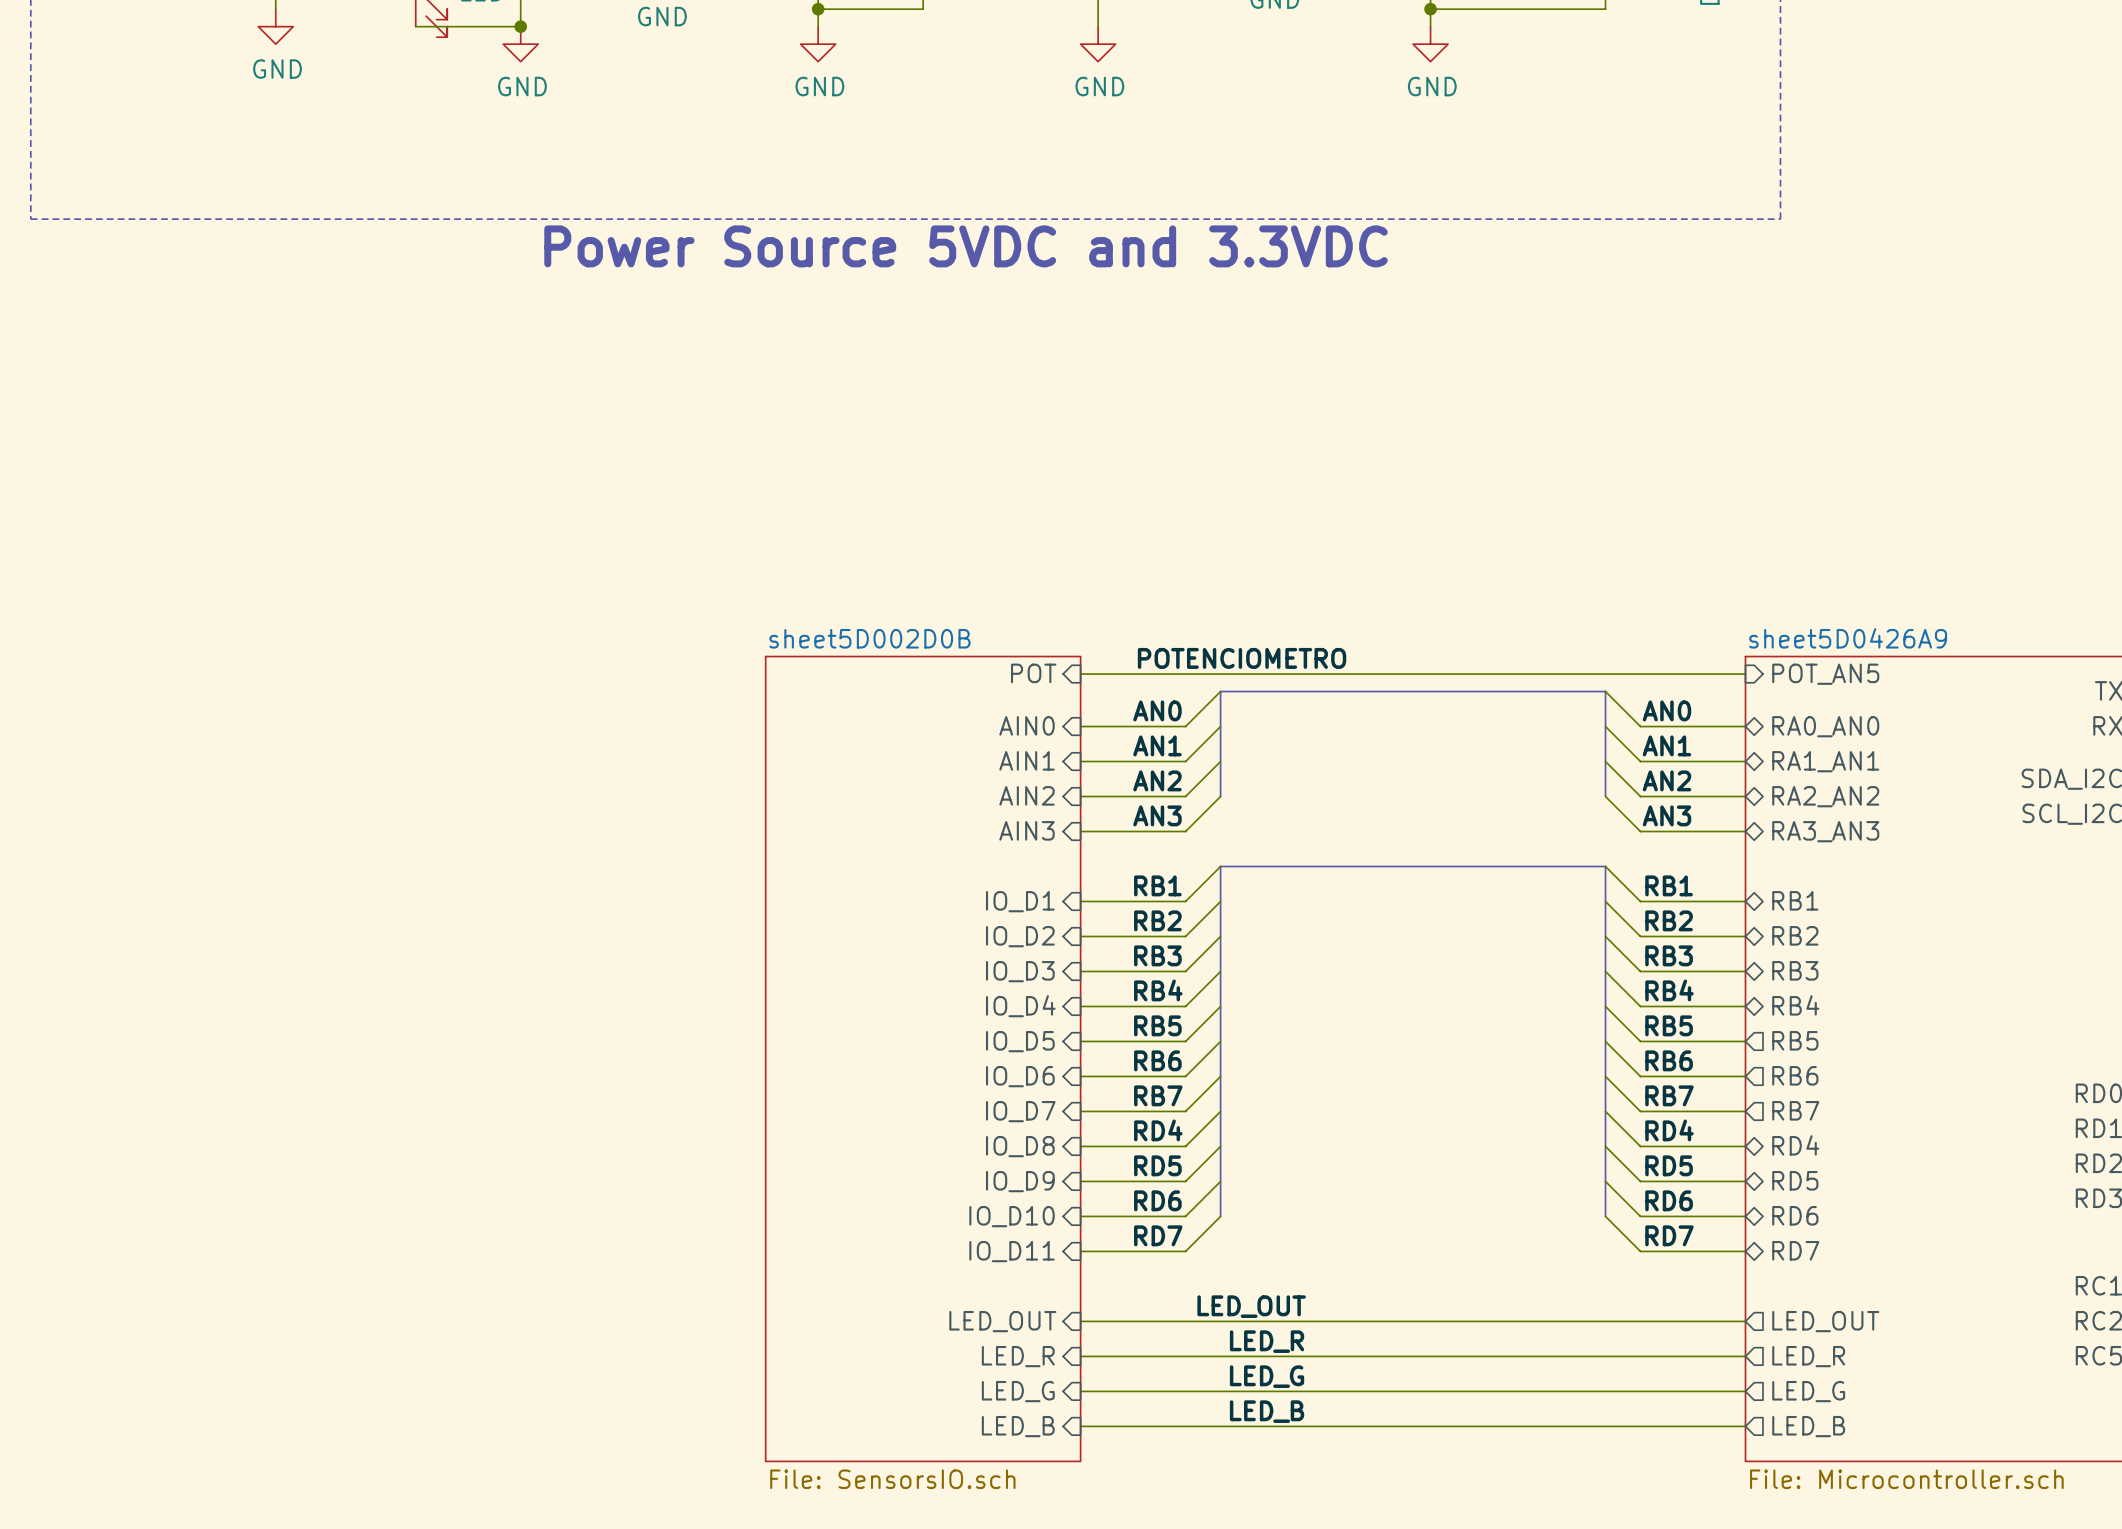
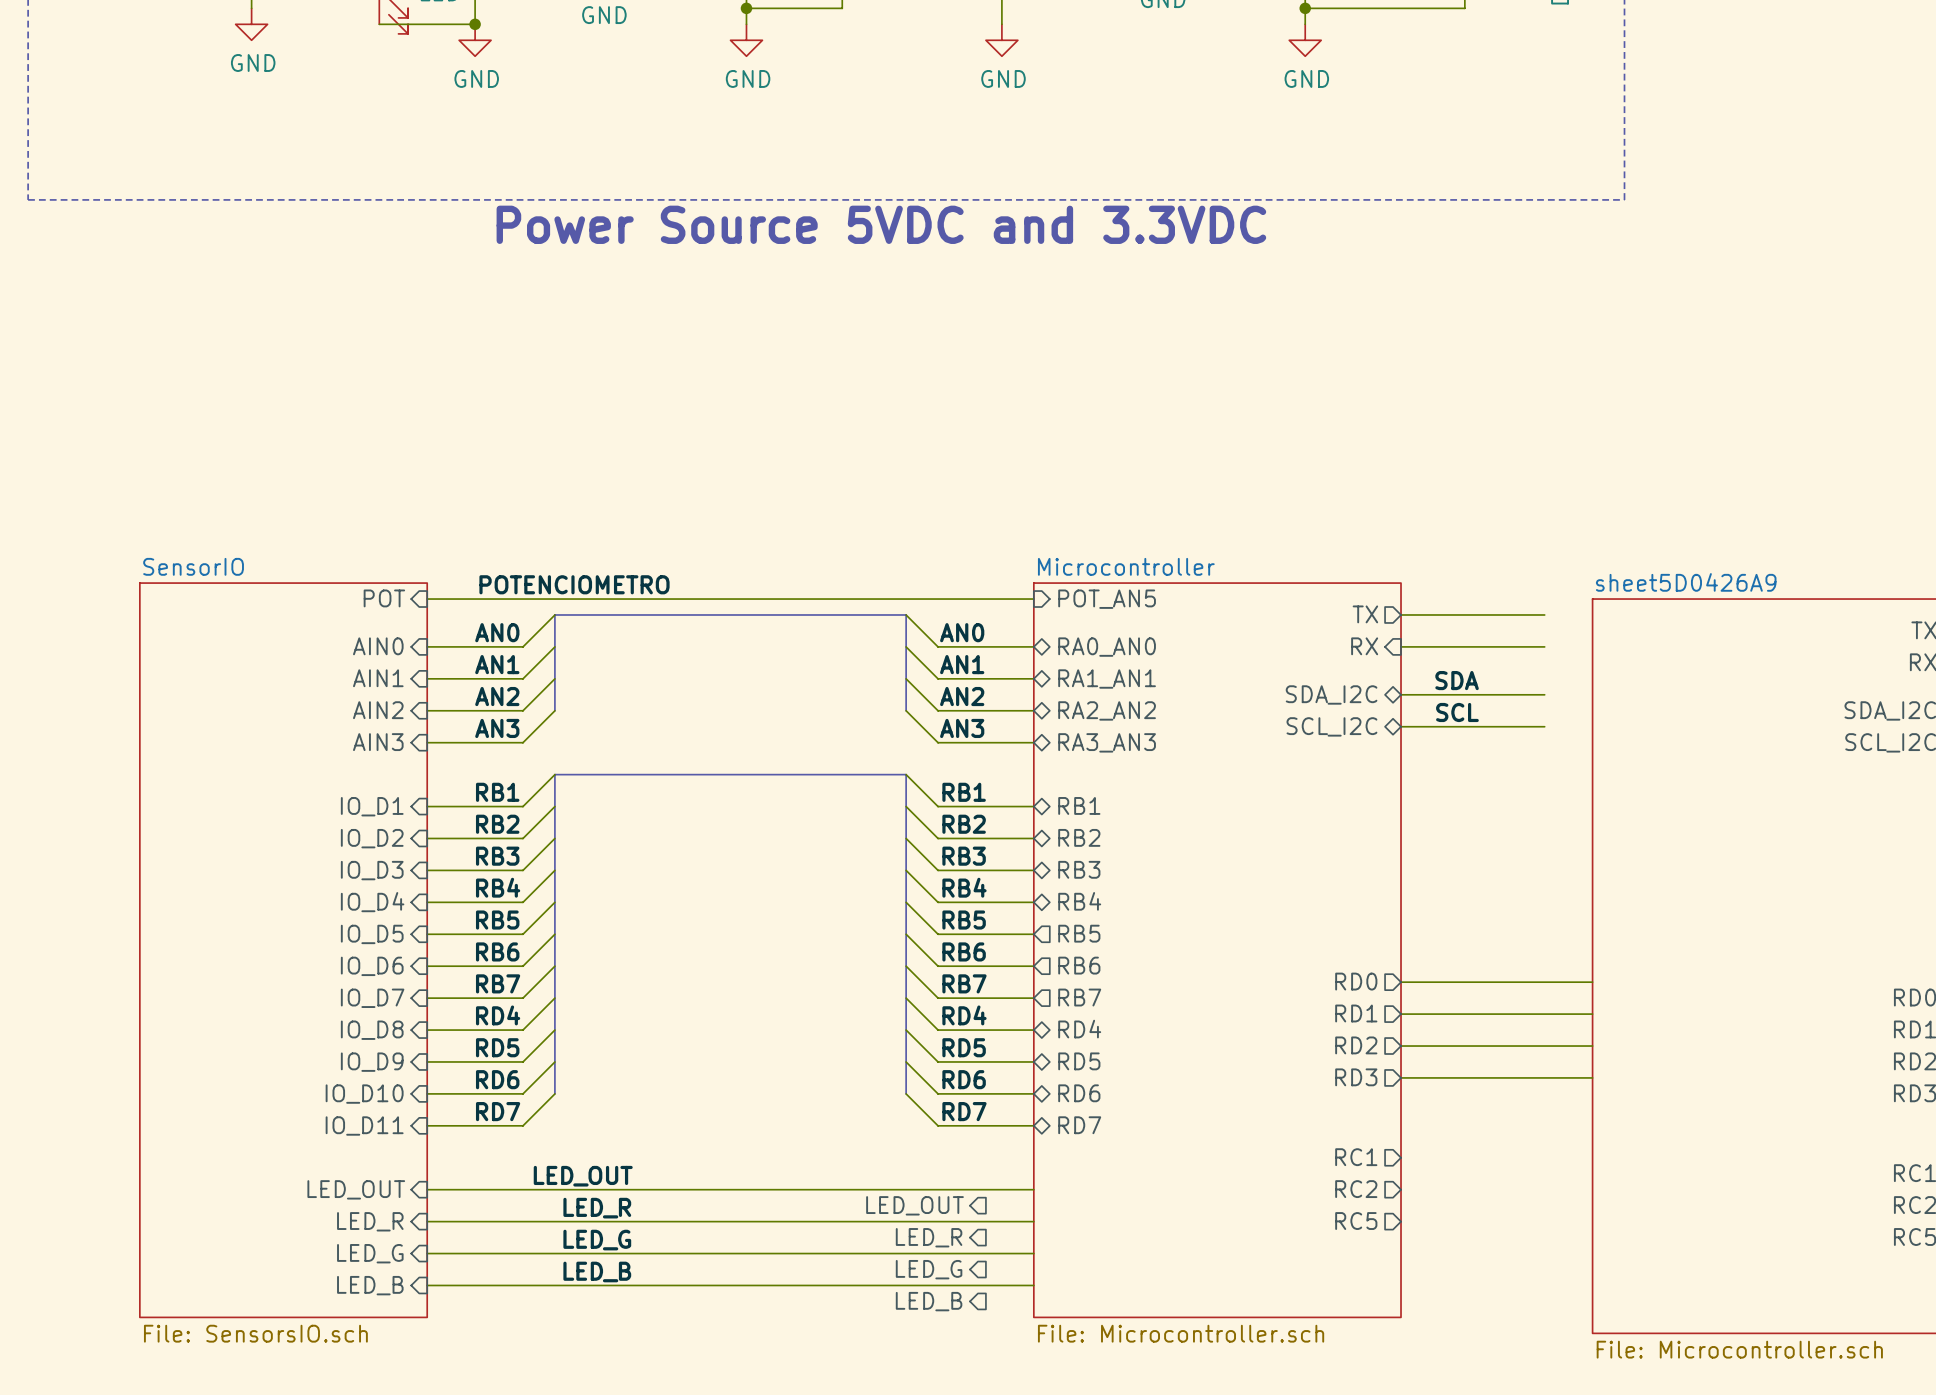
label: none -> POTENCIOMETRO (574, 584)
sheet pin: none -> POT (384, 598)
wire: none -> (427, 599) (1033, 599)
sheet pin: none -> POT_AN5 (1107, 599)
label: POTENCIOMETRO (1242, 658) -> none
sheet pin: POT (1033, 673) -> none
sheet pin: none -> TX (1365, 614)
wire: none -> (554, 614) (522, 646) (427, 646)
wire: none -> (906, 614) (938, 646) (1033, 646)
wire: (1080, 674) (1535, 674) -> none
wire: (1693, 674) (1745, 674) -> none
sheet pin: POT_AN5 (1825, 674) -> none
wire: (1220, 691) (1185, 726) (1080, 726) -> none
wire: (1605, 691) (1640, 726) (1745, 726) -> none
label: none -> AN0 (497, 632)
sheet pin: none -> AIN0 (378, 646)
sheet pin: none -> RX (1364, 646)
wire: none -> (554, 646) (522, 678) (427, 678)
wire: none -> (906, 646) (938, 678) (1033, 678)
sheet pin: none -> RA0_AN0 (1107, 647)
wire: none -> (1401, 646) (1544, 646)
label position: AN0 (1157, 710) -> AN0 (962, 632)
label: AN0 (1666, 710) -> none
sheet pin: AIN0 (1027, 725) -> none
wire: (1220, 726) (1185, 761) (1080, 761) -> none
wire: (1605, 726) (1640, 761) -> (1401, 694) (1496, 694)
sheet pin: RA0_AN0 (1825, 726) -> none
label: none -> AN1 (497, 664)
sheet pin: none -> AIN1 (378, 678)
wire: none -> (554, 678) (522, 710) (427, 710)
wire: none -> (906, 678) (938, 710) (1033, 710)
sheet pin: none -> RA1_AN1 (1107, 679)
label position: AN1 (1157, 745) -> AN1 (962, 664)
label: none -> SDA (1457, 680)
label: AN1 (1666, 745) -> none
sheet pin: AIN1 (1027, 760) -> none
wire: (1220, 761) (1185, 796) (1080, 796) -> none
sheet pin: none -> SDA_I2C (1331, 694)
wire: (1605, 761) (1640, 796) -> (1401, 726) (1496, 726)
wire: (1693, 761) (1745, 761) -> none
sheet pin: RA1_AN1 (1825, 761) -> none
label: none -> AN2 (497, 696)
sheet pin: none -> AIN2 (378, 710)
wire: none -> (554, 710) (522, 742) (427, 742)
bus: none -> (554, 710) (554, 614) (906, 614) (906, 710)
wire: none -> (906, 710) (938, 742) (1033, 742)
sheet pin: none -> RA2_AN2 (1107, 710)
label position: AN2 (1157, 780) -> AN2 (962, 696)
label: none -> SCL (1457, 712)
label: AN2 (1666, 780) -> none
sheet pin: AIN2 (1027, 795) -> none
wire: (1220, 796) (1185, 831) (1080, 831) -> none
bus: (1220, 796) (1220, 691) (1605, 691) (1605, 796) -> none
sheet pin: none -> SCL_I2C (1331, 726)
wire: (1605, 796) (1640, 831) (1745, 831) -> none
wire: (1693, 796) (1745, 796) -> none
sheet pin: RA2_AN2 (1825, 796) -> none
label: none -> AN3 (497, 728)
sheet pin: none -> AIN3 (378, 742)
sheet pin: none -> RA3_AN3 (1107, 742)
label position: AN3 (1157, 815) -> AN3 (962, 728)
label: AN3 (1666, 815) -> none
sheet pin: AIN3 (1027, 830) -> none
sheet pin: RA3_AN3 (1825, 831) -> none
wire: none -> (554, 774) (522, 806) (427, 806)
wire: none -> (906, 774) (938, 806) (1033, 806)
wire: (1220, 866) (1185, 901) (1080, 901) -> none
wire: (1605, 866) (1640, 901) (1745, 901) -> none
label: none -> RB1 (497, 792)
sheet pin: none -> RB1 (1079, 805)
sheet pin: none -> IO_D1 (372, 806)
wire: none -> (554, 806) (522, 838) (427, 838)
wire: none -> (906, 806) (938, 838) (1033, 838)
label position: RB1 (1157, 885) -> RB1 (964, 792)
label: RB1 (1669, 885) -> none
sheet pin: RB1 (1795, 900) -> none
sheet pin: IO_D1 (1020, 901) -> none
wire: (1220, 901) (1185, 936) (1080, 936) -> none
wire: (1605, 901) (1640, 936) (1745, 936) -> none
label: none -> RB2 (497, 824)
wire: none -> (554, 838) (522, 870) (427, 870)
wire: none -> (906, 838) (938, 870) (1033, 870)
sheet pin: none -> RB2 (1079, 837)
sheet pin: none -> IO_D2 (372, 838)
label position: RB2 (1157, 920) -> RB2 (964, 824)
label: RB2 (1669, 920) -> none
sheet pin: RB2 (1795, 935) -> none
sheet pin: IO_D2 (1020, 936) -> none
wire: (1220, 936) (1185, 971) (1080, 971) -> none
wire: (1605, 936) (1640, 971) (1745, 971) -> none
label: none -> RB3 (497, 856)
wire: none -> (554, 870) (522, 902) (427, 902)
wire: none -> (906, 870) (938, 902) (1033, 902)
sheet pin: none -> RB3 (1079, 869)
sheet pin: none -> IO_D3 (372, 870)
label position: RB3 (1157, 955) -> RB3 (964, 856)
label: RB3 (1669, 955) -> none
sheet pin: RB3 (1795, 970) -> none
sheet pin: IO_D3 (1020, 971) -> none
wire: (1220, 971) (1185, 1006) (1080, 1006) -> none
wire: (1605, 971) (1640, 1006) (1745, 1006) -> none
label: none -> RB4 (498, 887)
sheet pin: none -> RB4 (1079, 901)
sheet pin: none -> IO_D4 (372, 902)
wire: none -> (554, 902) (522, 934) (427, 934)
wire: none -> (906, 902) (938, 934) (1033, 934)
label position: RB4 (1158, 990) -> RB4 (964, 887)
label: RB4 (1669, 990) -> none
sheet pin: RB4 (1795, 1005) -> none
sheet pin: IO_D4 (1020, 1006) -> none
wire: (1220, 1006) (1185, 1041) (1080, 1041) -> none
wire: (1605, 1006) (1640, 1041) (1745, 1041) -> none
label: none -> RB5 (497, 920)
wire: none -> (554, 934) (522, 966) (427, 966)
wire: none -> (906, 934) (938, 966) (1033, 966)
sheet pin: none -> RB5 (1079, 933)
sheet pin: none -> IO_D5 (372, 934)
label position: RB5 (1157, 1025) -> RB5 (964, 920)
label: RB5 (1669, 1025) -> none
sheet pin: RB5 (1795, 1040) -> none
sheet SensorIO: none -> File: SensorsIO.sch (283, 950)
sheet pin: IO_D5 (1020, 1041) -> none
wire: (1220, 1041) (1185, 1076) (1080, 1076) -> none
sheet Microcontroller: none -> File: Microcontroller.sch (1217, 950)
wire: (1605, 1041) (1640, 1076) -> (1401, 982) (1496, 982)
label: none -> RB6 (497, 951)
wire: none -> (554, 966) (522, 998) (427, 998)
sheet sheet5D002D0B: File: SensorsIO.sch (923, 1058) -> none
wire: none -> (906, 966) (938, 998) (1033, 998)
sheet pin: none -> RB6 (1079, 965)
sheet pin: none -> IO_D6 (372, 966)
label position: RB6 (1157, 1060) -> RB6 (964, 951)
label: RB6 (1669, 1060) -> none
sheet pin: none -> RD0 (1356, 981)
sheet pin: RB6 (1795, 1075) -> none
sheet pin: IO_D6 (1020, 1076) -> none
wire: (1220, 1076) (1185, 1111) (1080, 1111) -> none
wire: (1605, 1076) (1640, 1111) -> (1401, 1014) (1496, 1014)
label: none -> RB7 (498, 983)
wire: none -> (554, 998) (522, 1030) (427, 1030)
wire: none -> (906, 998) (938, 1030) (1033, 1030)
sheet pin: none -> RB7 (1079, 997)
sheet pin: none -> IO_D7 (372, 998)
label position: RB7 (1158, 1095) -> RB7 (964, 983)
label: RB7 (1669, 1095) -> none
sheet pin: none -> RD1 (1356, 1013)
sheet pin: RB7 (1795, 1110) -> none
sheet pin: IO_D7 (1020, 1111) -> none
wire: (1220, 1111) (1185, 1146) (1080, 1146) -> none
wire: (1605, 1111) (1640, 1146) -> (1401, 1046) (1496, 1046)
label: none -> RD4 (498, 1015)
sheet pin: none -> RD4 (1079, 1029)
wire: none -> (554, 1030) (522, 1061) (427, 1061)
wire: none -> (906, 1030) (938, 1061) (1033, 1061)
sheet pin: none -> IO_D8 (372, 1030)
label position: RD4 (1158, 1130) -> RD4 (964, 1015)
label: RD4 (1669, 1130) -> none
sheet pin: none -> RD2 (1356, 1045)
sheet pin: RD4 (1795, 1145) -> none
sheet pin: IO_D8 (1020, 1146) -> none
wire: (1220, 1146) (1185, 1181) (1080, 1181) -> none
wire: (1605, 1146) (1640, 1181) -> (1401, 1077) (1496, 1077)
label: none -> RD5 (497, 1047)
wire: none -> (554, 1061) (522, 1093) (427, 1093)
wire: none -> (906, 1061) (938, 1093) (1033, 1093)
sheet pin: none -> RD5 (1079, 1061)
sheet pin: none -> IO_D9 (372, 1062)
label position: RD5 (1157, 1165) -> RD5 (964, 1047)
label: RD5 (1669, 1165) -> none
sheet pin: none -> RD3 (1356, 1077)
sheet pin: RD5 (1795, 1180) -> none
sheet pin: IO_D9 (1020, 1181) -> none
wire: (1220, 1181) (1185, 1216) (1080, 1216) -> none
wire: (1605, 1181) (1640, 1216) (1745, 1216) -> none
label: none -> RD6 (497, 1079)
wire: none -> (554, 1093) (522, 1125) (427, 1125)
bus: none -> (554, 1093) (554, 774) (906, 774) (906, 1093)
wire: none -> (906, 1093) (938, 1125) (1033, 1125)
sheet pin: none -> RD6 (1079, 1093)
sheet pin: none -> IO_D10 (364, 1094)
label position: RD6 (1157, 1200) -> RD6 (964, 1079)
label: RD6 (1669, 1200) -> none
sheet pin: RD6 (1795, 1215) -> none
sheet pin: IO_D10 (1012, 1216) -> none
wire: (1220, 1216) (1185, 1251) (1080, 1251) -> none
bus: (1220, 1216) (1220, 866) (1605, 866) (1605, 1216) -> none
wire: (1605, 1216) (1640, 1251) (1745, 1251) -> none
label: none -> RD7 (498, 1111)
sheet pin: none -> RD7 (1079, 1125)
sheet pin: none -> IO_D11 (364, 1126)
label position: RD7 (1158, 1235) -> RD7 (964, 1111)
label: RD7 (1669, 1235) -> none
sheet pin: RD7 (1795, 1250) -> none
sheet pin: IO_D11 (1012, 1251) -> none
sheet pin: none -> RC1 (1356, 1157)
label: none -> LED_OUT (583, 1176)
wire: none -> (427, 1189) (1033, 1189)
sheet pin: none -> RC2 (1356, 1189)
sheet pin: none -> LED_OUT (356, 1189)
label: LED_OUT (1251, 1306) -> none
wire: (1080, 1321) (1745, 1321) -> none
sheet pin: LED_OUT (1825, 1321) -> none
label: none -> LED_R (597, 1208)
wire: none -> (427, 1221) (1033, 1221)
sheet pin: none -> RC5 (1356, 1221)
sheet pin: none -> LED_R (370, 1221)
label: LED_R (1267, 1341) -> none
wire: (1080, 1356) (1745, 1356) -> none
sheet pin: LED_R (1808, 1356) -> none
label: none -> LED_G (597, 1240)
wire: none -> (427, 1253) (1033, 1253)
sheet pin: none -> LED_G (370, 1253)
label: LED_G (1267, 1376) -> none
wire: (1080, 1391) (1745, 1391) -> none
sheet pin: LED_G (1808, 1391) -> none
label: none -> LED_B (597, 1271)
wire: none -> (427, 1285) (1033, 1285)
sheet pin: none -> LED_B (370, 1285)
label: LED_B (1267, 1411) -> none
wire: (1080, 1426) (1745, 1426) -> none
sheet pin: LED_B (1808, 1426) -> none

